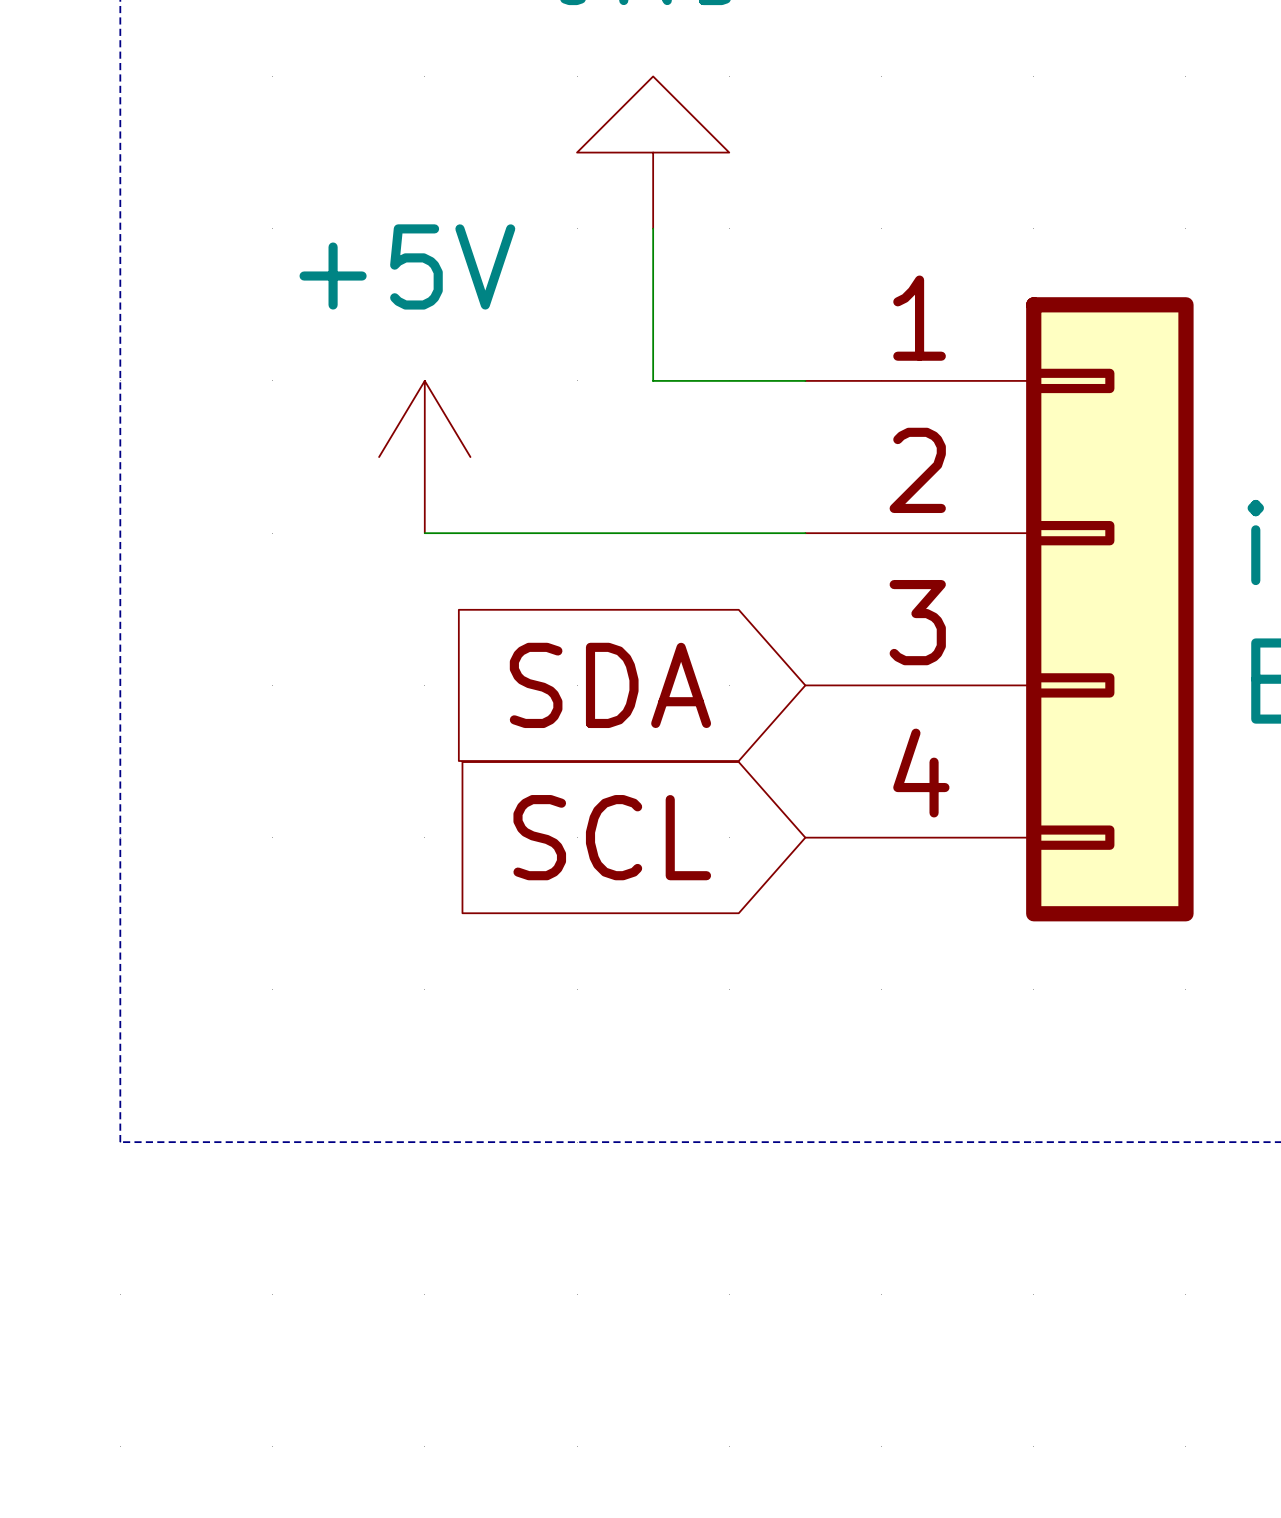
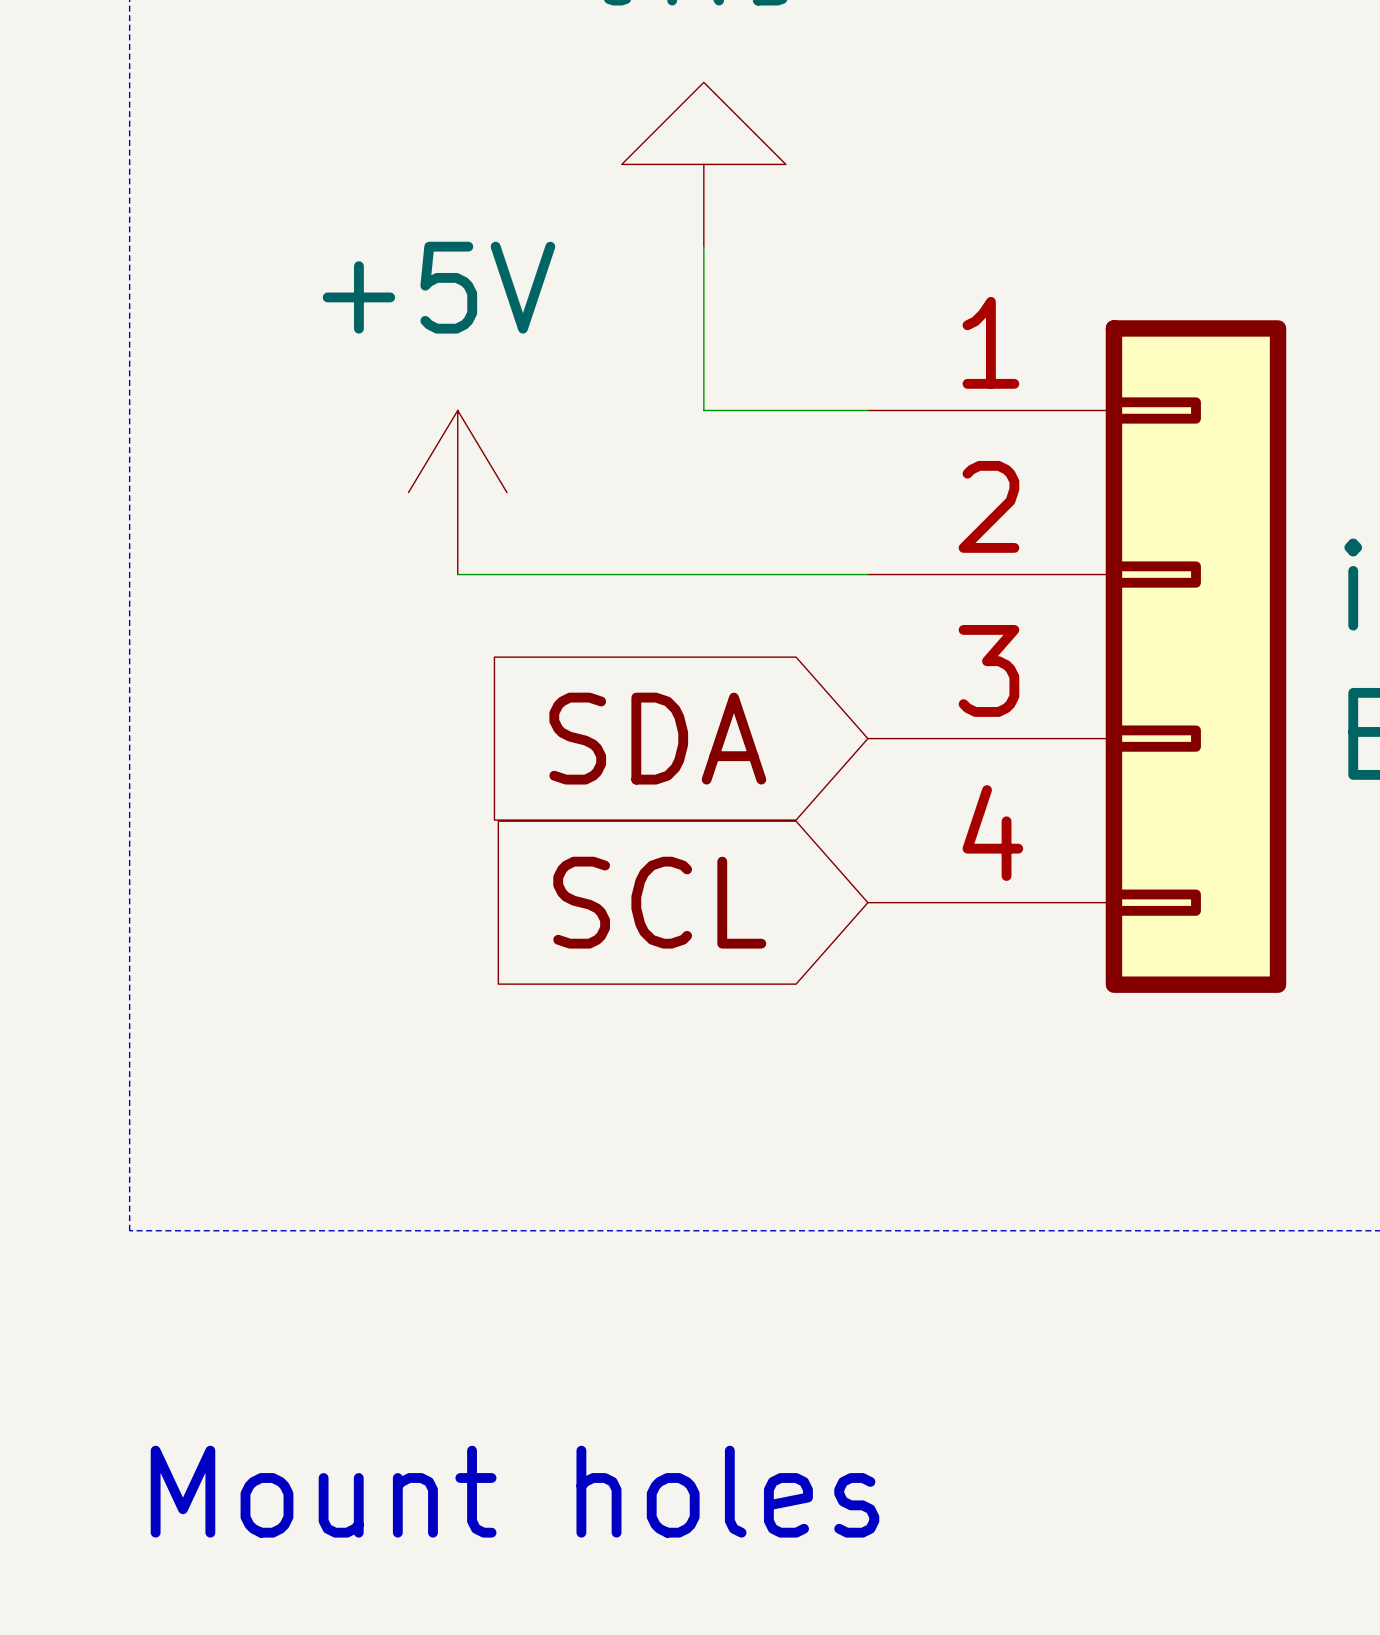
text: none -> Mount holes (515, 1491)

